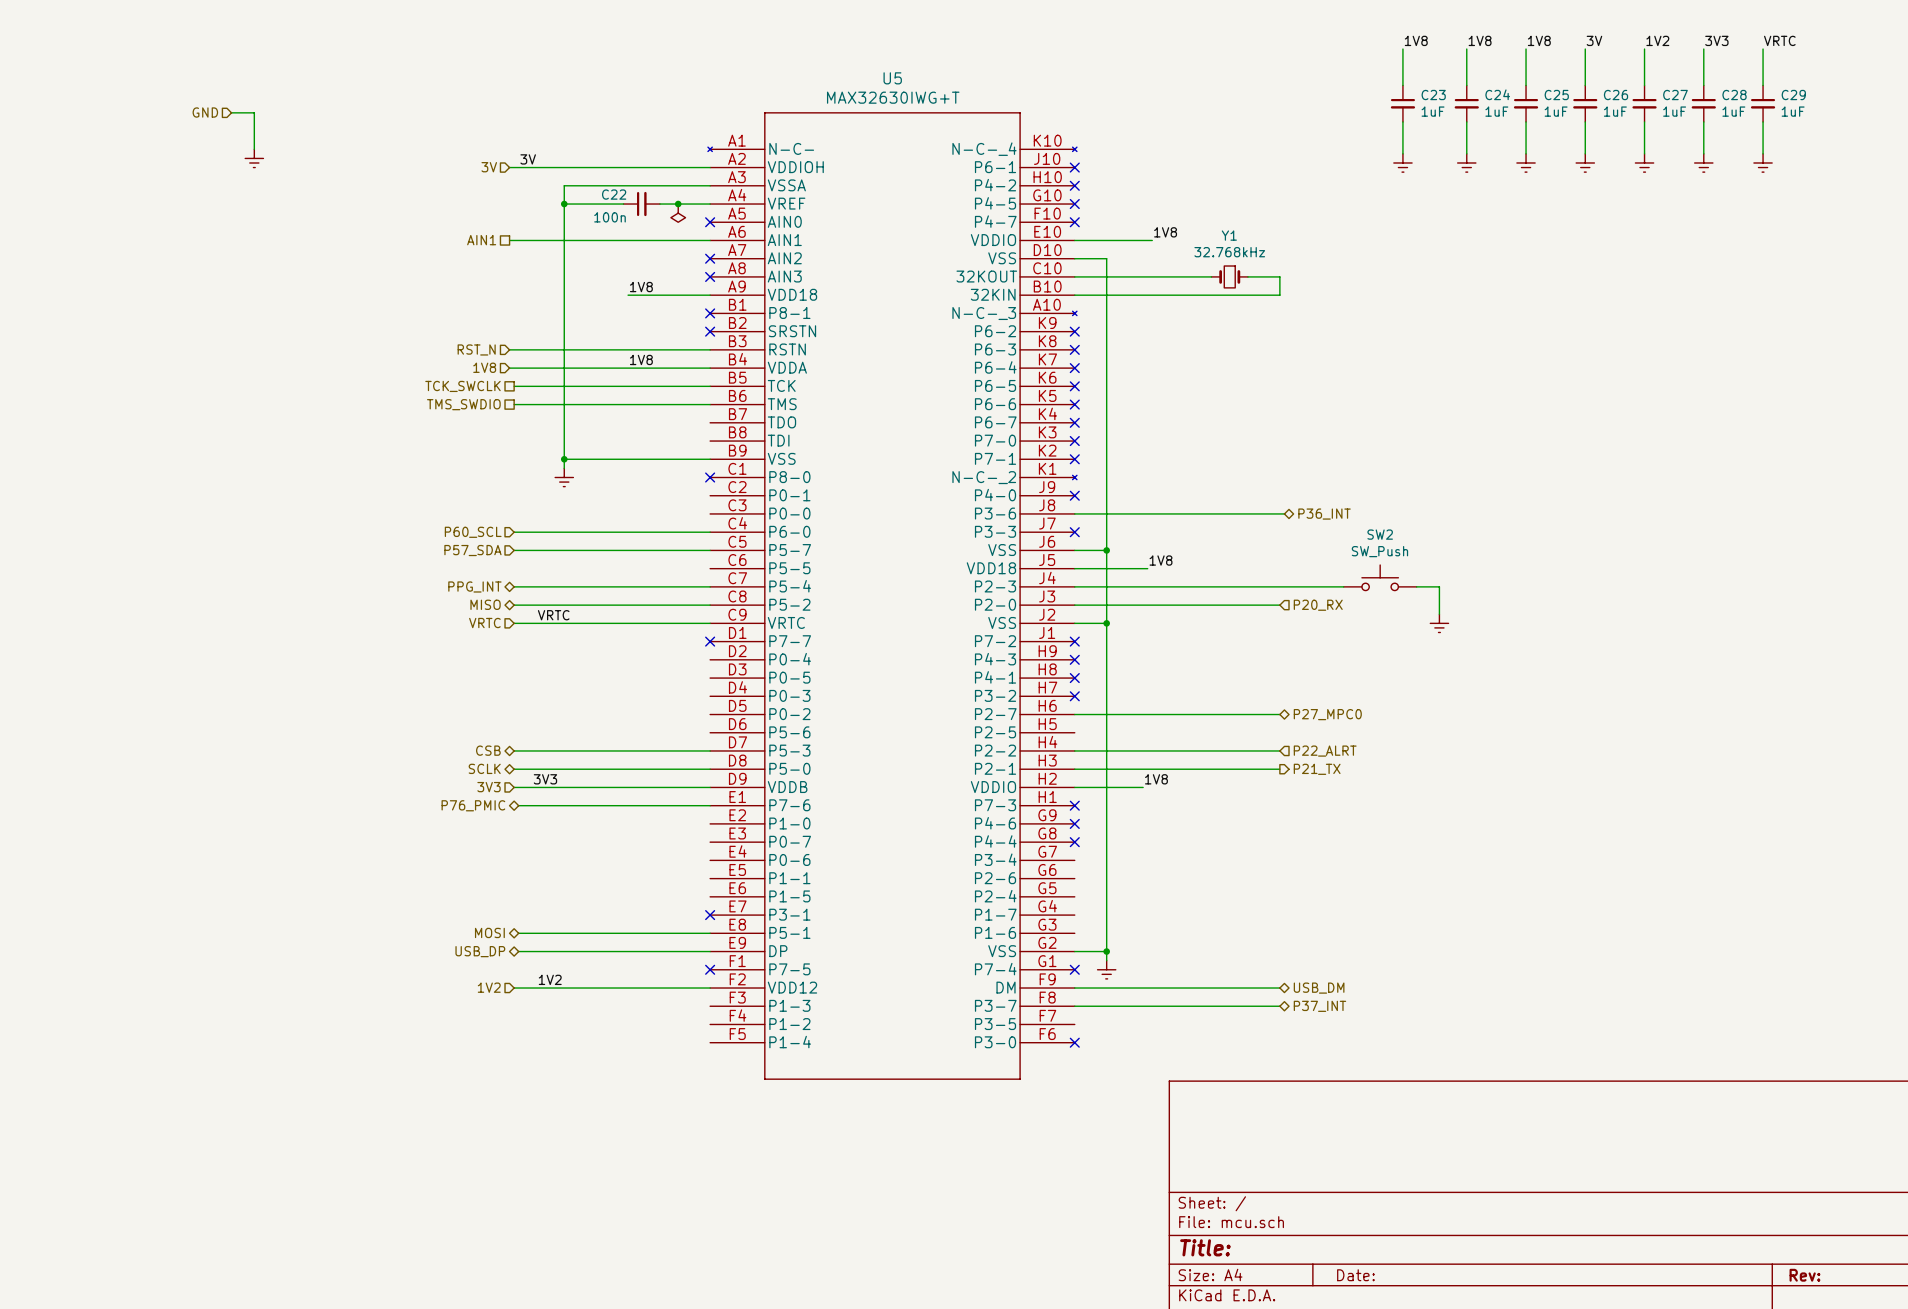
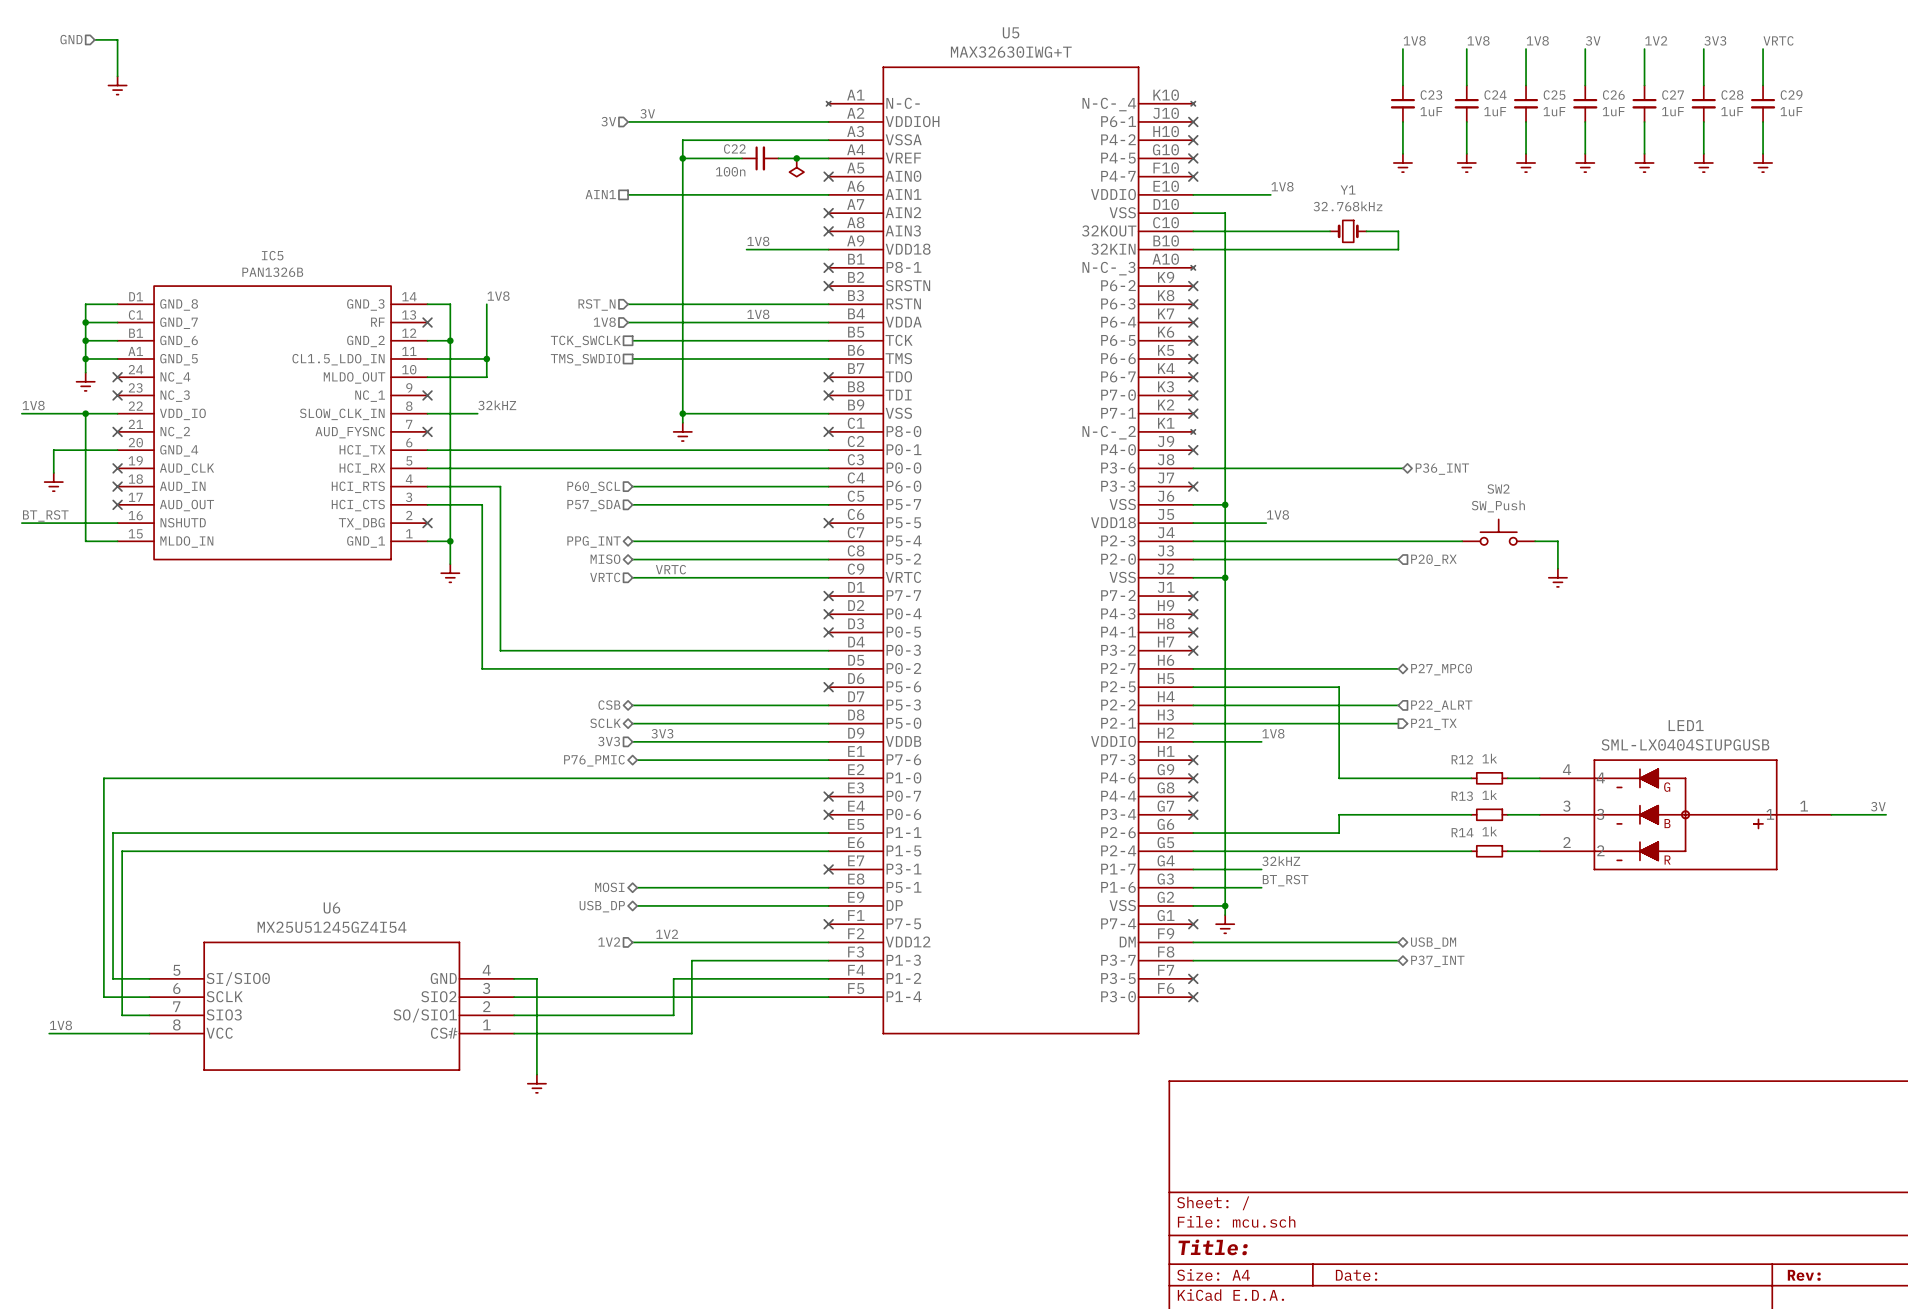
power symbol: none -> (117, 85)
hierarchical label position: GND (205, 112) -> GND (71, 39)
wire: (231, 112) (254, 112) (254, 149) -> (94, 39) (117, 39) (117, 76)
no-connect mark: none -> (1193, 121)
no-connect mark: none -> (1193, 140)
power symbol: (254, 158) -> none
junction: none -> (682, 158)
junction: none -> (796, 158)
no-connect mark: none -> (1193, 158)
label position: 3V (528, 159) -> 3V (647, 113)
hierarchical label position: 3V (489, 167) -> 3V (608, 121)
wire: (509, 167) (710, 167) -> (628, 121) (828, 121)
no-connect mark: (1074, 167) -> none
no-connect mark: none -> (828, 176)
no-connect mark: none -> (1193, 176)
wire: (710, 185) (564, 185) (564, 468) -> (828, 140) (682, 140) (682, 422)
no-connect mark: (1074, 185) -> none
wire: (564, 204) (623, 204) -> (682, 158) (742, 158)
junction: (564, 204) -> none
C22 position: (641, 204) -> (760, 158)
wire: (659, 204) (710, 204) -> (778, 158) (828, 158)
junction: (678, 204) -> none
no-connect mark: (1074, 204) -> none
power symbol position: (678, 213) -> (796, 167)
no-connect mark: none -> (828, 213)
no-connect mark: (710, 222) -> none
no-connect mark: (1074, 222) -> none
no-connect mark: none -> (828, 231)
label position: 1V8 (1165, 232) -> 1V8 (1282, 186)
hierarchical label position: AIN1 (481, 240) -> AIN1 (600, 194)
wire: (509, 240) (710, 240) -> (628, 194) (828, 194)
wire: (1074, 240) (1152, 240) -> (1193, 194) (1270, 194)
label: none -> 1V8 (758, 241)
no-connect mark: (710, 258) -> none
wire: (1074, 258) (1106, 258) (1106, 960) -> (1193, 213) (1225, 213) (1225, 915)
no-connect mark: none -> (828, 267)
no-connect mark: (710, 276) -> none
wire: (1074, 276) (1211, 276) -> (1193, 231) (1330, 231)
Y1 position: (1229, 276) -> (1348, 231)
wire: (1247, 276) (1279, 276) (1279, 295) (1074, 295) -> (1366, 231) (1398, 231) (1398, 249) (1193, 249)
no-connect mark: none -> (828, 286)
no-connect mark: none -> (1193, 286)
label: 1V8 (641, 287) -> none
wire: (628, 295) (710, 295) -> (746, 249) (828, 249)
label: none -> 1V8 (498, 296)
wire: none -> (117, 304) (85, 304) (85, 372)
wire: none -> (427, 304) (450, 304) (450, 564)
wire: none -> (486, 304) (486, 377) (427, 377)
no-connect mark: none -> (1193, 304)
no-connect mark: (710, 313) -> none
label: none -> 1V8 (758, 314)
wire: none -> (85, 322) (117, 322)
junction: none -> (85, 322)
no-connect mark: none -> (427, 322)
no-connect mark: none -> (1193, 322)
no-connect mark: (710, 331) -> none
no-connect mark: (1074, 331) -> none
wire: none -> (85, 340) (117, 340)
junction: none -> (85, 340)
wire: none -> (427, 340) (450, 340)
junction: none -> (450, 340)
no-connect mark: none -> (1193, 340)
hierarchical label position: RST_N (476, 349) -> RST_N (596, 304)
wire: (509, 349) (710, 349) -> (628, 304) (828, 304)
no-connect mark: (1074, 349) -> none
wire: none -> (85, 358) (117, 358)
junction: none -> (85, 358)
wire: none -> (427, 358) (486, 358)
junction: none -> (486, 358)
no-connect mark: none -> (1193, 358)
label: 1V8 (641, 359) -> none
hierarchical label position: 1V8 (484, 367) -> 1V8 (604, 322)
wire: (509, 368) (710, 368) -> (628, 322) (828, 322)
no-connect mark: (1074, 368) -> none
no-connect mark: none -> (117, 377)
no-connect mark: none -> (828, 377)
no-connect mark: none -> (1193, 377)
power symbol: none -> (85, 381)
hierarchical label position: TCK_SWCLK (462, 386) -> TCK_SWCLK (585, 341)
wire: (514, 386) (710, 386) -> (632, 340) (828, 340)
no-connect mark: (1074, 386) -> none
no-connect mark: none -> (117, 395)
no-connect mark: none -> (427, 395)
no-connect mark: none -> (828, 395)
no-connect mark: none -> (1193, 395)
hierarchical label position: TMS_SWDIO (463, 404) -> TMS_SWDIO (585, 359)
wire: (514, 404) (710, 404) -> (632, 358) (828, 358)
no-connect mark: (1074, 404) -> none
label: none -> 1V8 (33, 405)
label: none -> 32kHZ (497, 405)
wire: none -> (21, 413) (117, 413)
wire: none -> (85, 413) (85, 541) (117, 541)
junction: none -> (85, 413)
wire: none -> (427, 413) (477, 413)
junction: none -> (682, 413)
no-connect mark: none -> (1193, 413)
IC5: none -> PAN1326B (272, 422)
no-connect mark: (1074, 422) -> none
no-connect mark: none -> (117, 431)
no-connect mark: none -> (427, 431)
power symbol: none -> (682, 431)
no-connect mark: none -> (828, 431)
no-connect mark: (1074, 441) -> none
wire: none -> (117, 450) (53, 450) (53, 472)
wire: none -> (427, 450) (828, 450)
no-connect mark: none -> (1193, 450)
wire: (564, 459) (710, 459) -> (682, 413) (828, 413)
junction: (564, 459) -> none
no-connect mark: (1074, 459) -> none
no-connect mark: none -> (117, 468)
wire: none -> (427, 468) (828, 468)
power symbol: (564, 477) -> none
no-connect mark: (710, 477) -> none
power symbol: none -> (53, 482)
no-connect mark: none -> (117, 486)
wire: none -> (427, 486) (500, 486) (500, 650) (828, 650)
no-connect mark: none -> (1193, 486)
no-connect mark: (1074, 495) -> none
no-connect mark: none -> (117, 504)
wire: none -> (427, 504) (482, 504) (482, 668) (828, 668)
junction: none -> (1225, 504)
wire: (1074, 513) (1284, 513) -> (1193, 468) (1402, 468)
label: none -> 1V8 (1277, 514)
hierarchical label position: P36_INT (1324, 514) -> P36_INT (1442, 469)
label: none -> BT_RST (45, 515)
wire: none -> (21, 523) (117, 523)
no-connect mark: none -> (427, 523)
no-connect mark: none -> (828, 523)
hierarchical label position: P60_SCL (473, 532) -> P60_SCL (593, 487)
wire: (514, 532) (710, 532) -> (632, 486) (828, 486)
no-connect mark: (1074, 532) -> none
wire: none -> (427, 541) (450, 541)
junction: none -> (450, 541)
hierarchical label position: P57_SDA (472, 550) -> P57_SDA (594, 505)
wire: (514, 550) (710, 550) -> (632, 504) (828, 504)
wire: (1074, 550) (1106, 550) -> (1193, 504) (1225, 504)
junction: (1106, 550) -> none
label: 1V8 (1161, 560) -> none
wire: (1074, 568) (1147, 568) -> (1193, 523) (1266, 523)
power symbol: none -> (450, 573)
junction: none -> (1225, 577)
SW2 position: (1380, 577) -> (1498, 532)
hierarchical label position: PPG_INT (474, 586) -> PPG_INT (594, 542)
wire: (514, 586) (710, 586) -> (632, 541) (828, 541)
wire: (1074, 586) (1343, 586) -> (1193, 541) (1462, 541)
wire: (1416, 586) (1439, 586) (1439, 614) -> (1535, 541) (1557, 541) (1557, 568)
no-connect mark: none -> (828, 596)
U5 position: (892, 596) -> (1010, 550)
no-connect mark: none -> (1193, 596)
hierarchical label position: MISO (485, 604) -> MISO (605, 559)
wire: (514, 605) (710, 605) -> (632, 559) (828, 559)
wire: (1074, 605) (1279, 605) -> (1193, 559) (1398, 559)
hierarchical label position: P20_RX (1318, 605) -> P20_RX (1433, 560)
no-connect mark: none -> (828, 614)
no-connect mark: none -> (1193, 614)
label position: VRTC (553, 615) -> VRTC (670, 569)
hierarchical label position: VRTC (484, 623) -> VRTC (605, 577)
wire: (514, 623) (710, 623) -> (632, 577) (828, 577)
wire: (1074, 623) (1106, 623) -> (1193, 577) (1225, 577)
junction: (1106, 623) -> none
power symbol position: (1439, 623) -> (1557, 577)
no-connect mark: none -> (828, 632)
no-connect mark: none -> (1193, 632)
no-connect mark: (710, 641) -> none
no-connect mark: (1074, 641) -> none
no-connect mark: none -> (1193, 650)
no-connect mark: (1074, 659) -> none
no-connect mark: (1074, 678) -> none
no-connect mark: none -> (828, 687)
wire: none -> (1193, 687) (1339, 687) (1339, 778) (1471, 778)
no-connect mark: (1074, 696) -> none
wire: (1074, 714) (1279, 714) -> (1193, 668) (1398, 668)
hierarchical label position: P27_MPC0 (1327, 714) -> P27_MPC0 (1441, 669)
label: none -> 1V8 (1273, 733)
hierarchical label position: CSB (488, 750) -> CSB (609, 705)
wire: (514, 750) (710, 750) -> (632, 705) (828, 705)
wire: (1074, 750) (1279, 750) -> (1193, 705) (1398, 705)
hierarchical label position: P22_ALRT (1325, 751) -> P22_ALRT (1441, 706)
no-connect mark: none -> (1193, 760)
hierarchical label position: SCLK (484, 768) -> SCLK (605, 723)
wire: (514, 769) (710, 769) -> (632, 723) (828, 723)
wire: (1074, 769) (1279, 769) -> (1193, 723) (1398, 723)
hierarchical label position: P21_TX (1317, 769) -> P21_TX (1433, 724)
wire: none -> (828, 778) (103, 778) (103, 997) (149, 997)
no-connect mark: none -> (1193, 778)
R12: none -> 1k (1489, 778)
wire: none -> (1507, 778) (1539, 778)
label position: 3V3 (545, 779) -> 3V3 (662, 733)
label: 1V8 (1156, 779) -> none
hierarchical label position: 3V3 (489, 787) -> 3V3 (609, 741)
wire: (514, 787) (710, 787) -> (632, 741) (828, 741)
wire: (1074, 787) (1143, 787) -> (1193, 741) (1261, 741)
no-connect mark: none -> (828, 796)
no-connect mark: none -> (1193, 796)
hierarchical label position: P76_PMIC (473, 805) -> P76_PMIC (594, 760)
wire: (518, 805) (710, 805) -> (637, 760) (828, 760)
no-connect mark: (1074, 805) -> none
label: none -> 3V (1878, 806)
no-connect mark: none -> (828, 814)
no-connect mark: none -> (1193, 814)
wire: none -> (1471, 814) (1339, 814) (1339, 833) (1193, 833)
R13: none -> 1k (1489, 814)
wire: none -> (1507, 814) (1539, 814)
LED1: none -> SML-LX0404SIUPGUSB (1685, 814)
wire: none -> (1831, 814) (1886, 814)
no-connect mark: (1074, 823) -> none
wire: none -> (828, 833) (113, 833) (113, 978) (149, 978)
no-connect mark: (1074, 842) -> none
wire: none -> (828, 851) (122, 851) (122, 1015) (149, 1015)
wire: none -> (1193, 851) (1471, 851)
R14: none -> 1k (1489, 851)
wire: none -> (1507, 851) (1539, 851)
label: none -> 32kHZ (1281, 861)
no-connect mark: none -> (828, 869)
wire: none -> (1193, 869) (1261, 869)
label: none -> BT_RST (1285, 880)
wire: none -> (1193, 887) (1261, 887)
junction: none -> (1225, 905)
no-connect mark: (710, 915) -> none
no-connect mark: none -> (828, 924)
no-connect mark: none -> (1193, 924)
hierarchical label position: MOSI (489, 932) -> MOSI (609, 887)
wire: (518, 933) (710, 933) -> (637, 887) (828, 887)
hierarchical label position: USB_DP (480, 951) -> USB_DP (602, 906)
wire: (518, 951) (710, 951) -> (637, 905) (828, 905)
wire: (1074, 951) (1106, 951) -> (1193, 905) (1225, 905)
junction: (1106, 951) -> none
wire: none -> (828, 960) (691, 960) (691, 1033) (514, 1033)
no-connect mark: (710, 969) -> none
no-connect mark: (1074, 969) -> none
power symbol position: (1106, 969) -> (1225, 924)
wire: none -> (514, 978) (536, 978) (536, 1074)
wire: none -> (828, 978) (673, 978) (673, 1015) (514, 1015)
no-connect mark: none -> (1193, 978)
label position: 1V2 (550, 979) -> 1V2 (667, 934)
hierarchical label position: 1V2 (489, 987) -> 1V2 (609, 942)
wire: (514, 988) (710, 988) -> (632, 942) (828, 942)
wire: (1074, 988) (1279, 988) -> (1193, 942) (1398, 942)
hierarchical label position: USB_DM (1319, 988) -> USB_DM (1433, 943)
wire: none -> (514, 997) (828, 997)
no-connect mark: none -> (1193, 997)
U6: none -> MX25U51245GZ4I54 (331, 1006)
wire: (1074, 1006) (1279, 1006) -> (1193, 960) (1398, 960)
hierarchical label position: P37_INT (1319, 1006) -> P37_INT (1437, 961)
label: none -> 1V8 (60, 1025)
wire: none -> (49, 1033) (149, 1033)
no-connect mark: (1074, 1042) -> none
power symbol: none -> (536, 1083)

